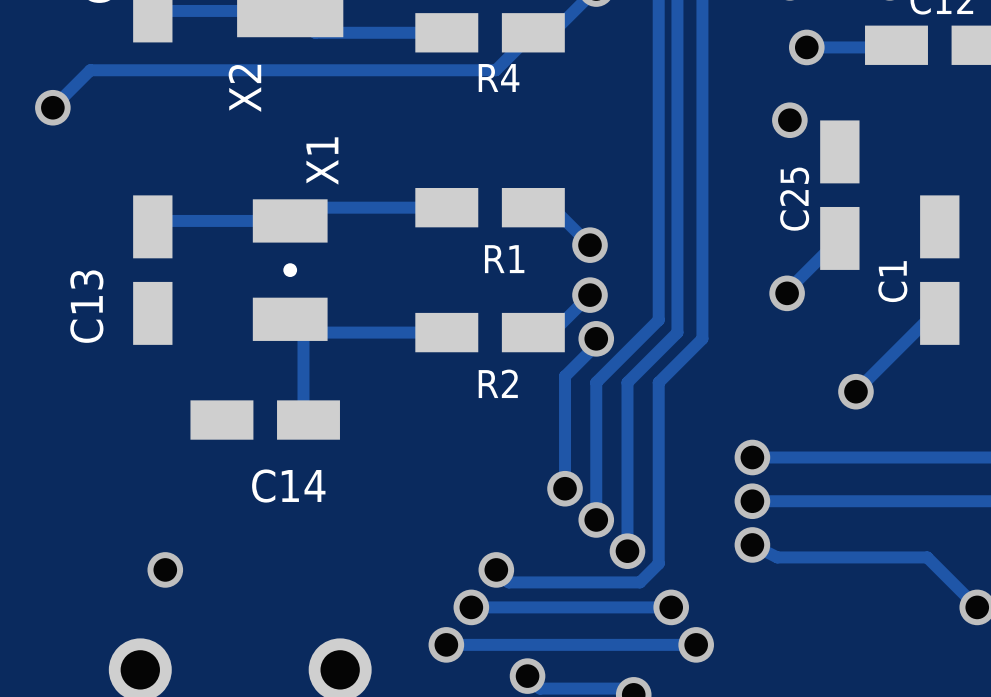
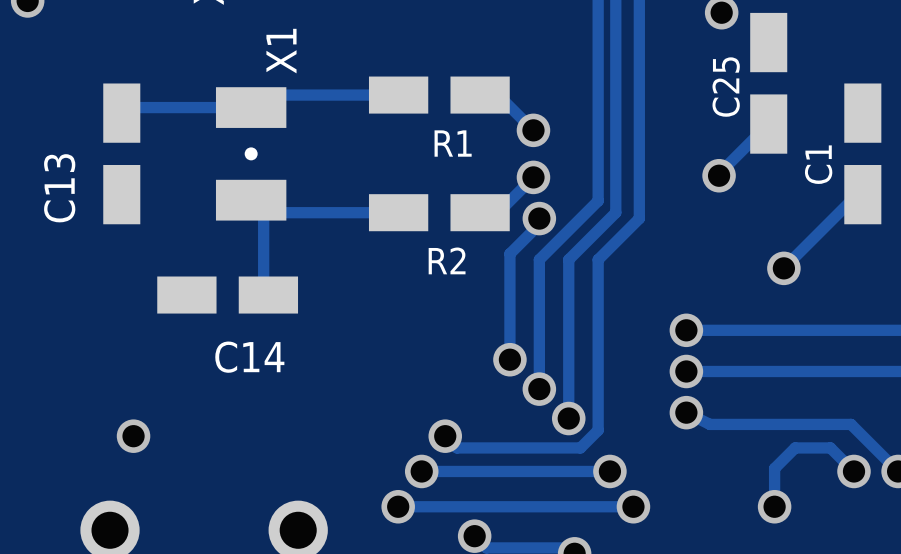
track: none -> (854, 471) (830, 447) (795, 447) (774, 468) (774, 506)
via: none -> (854, 471)
via: none -> (774, 506)

